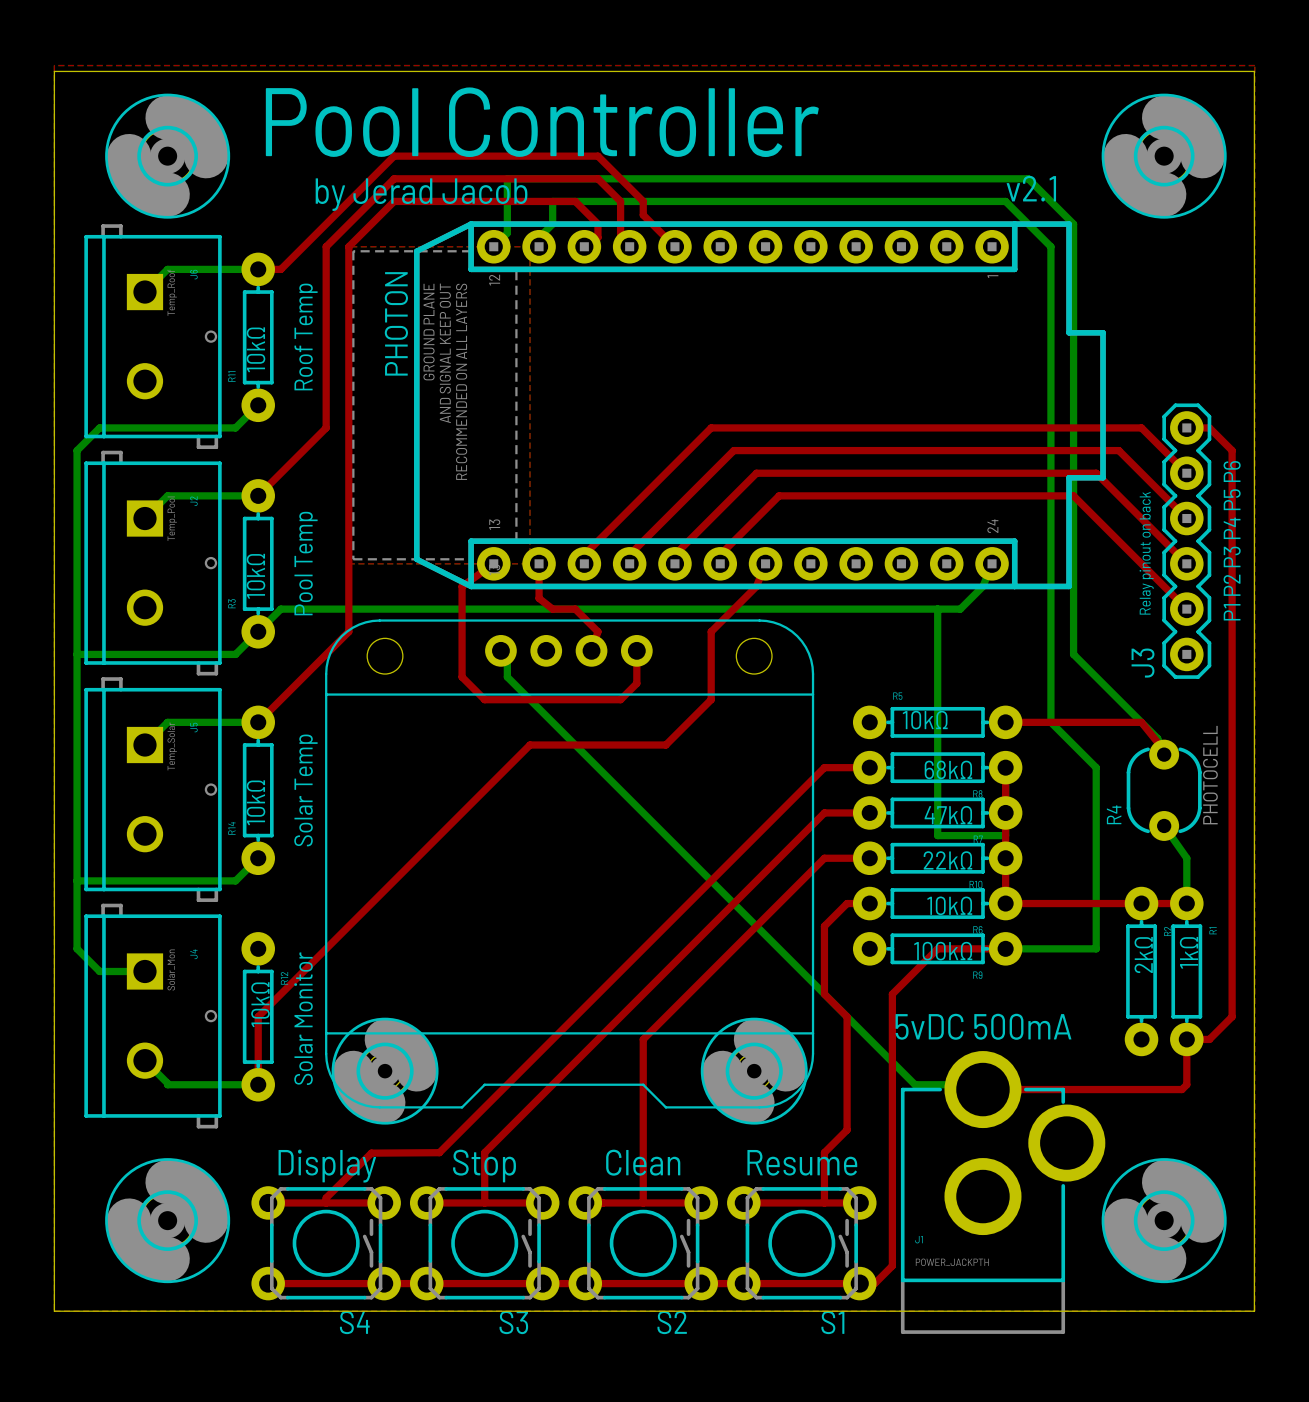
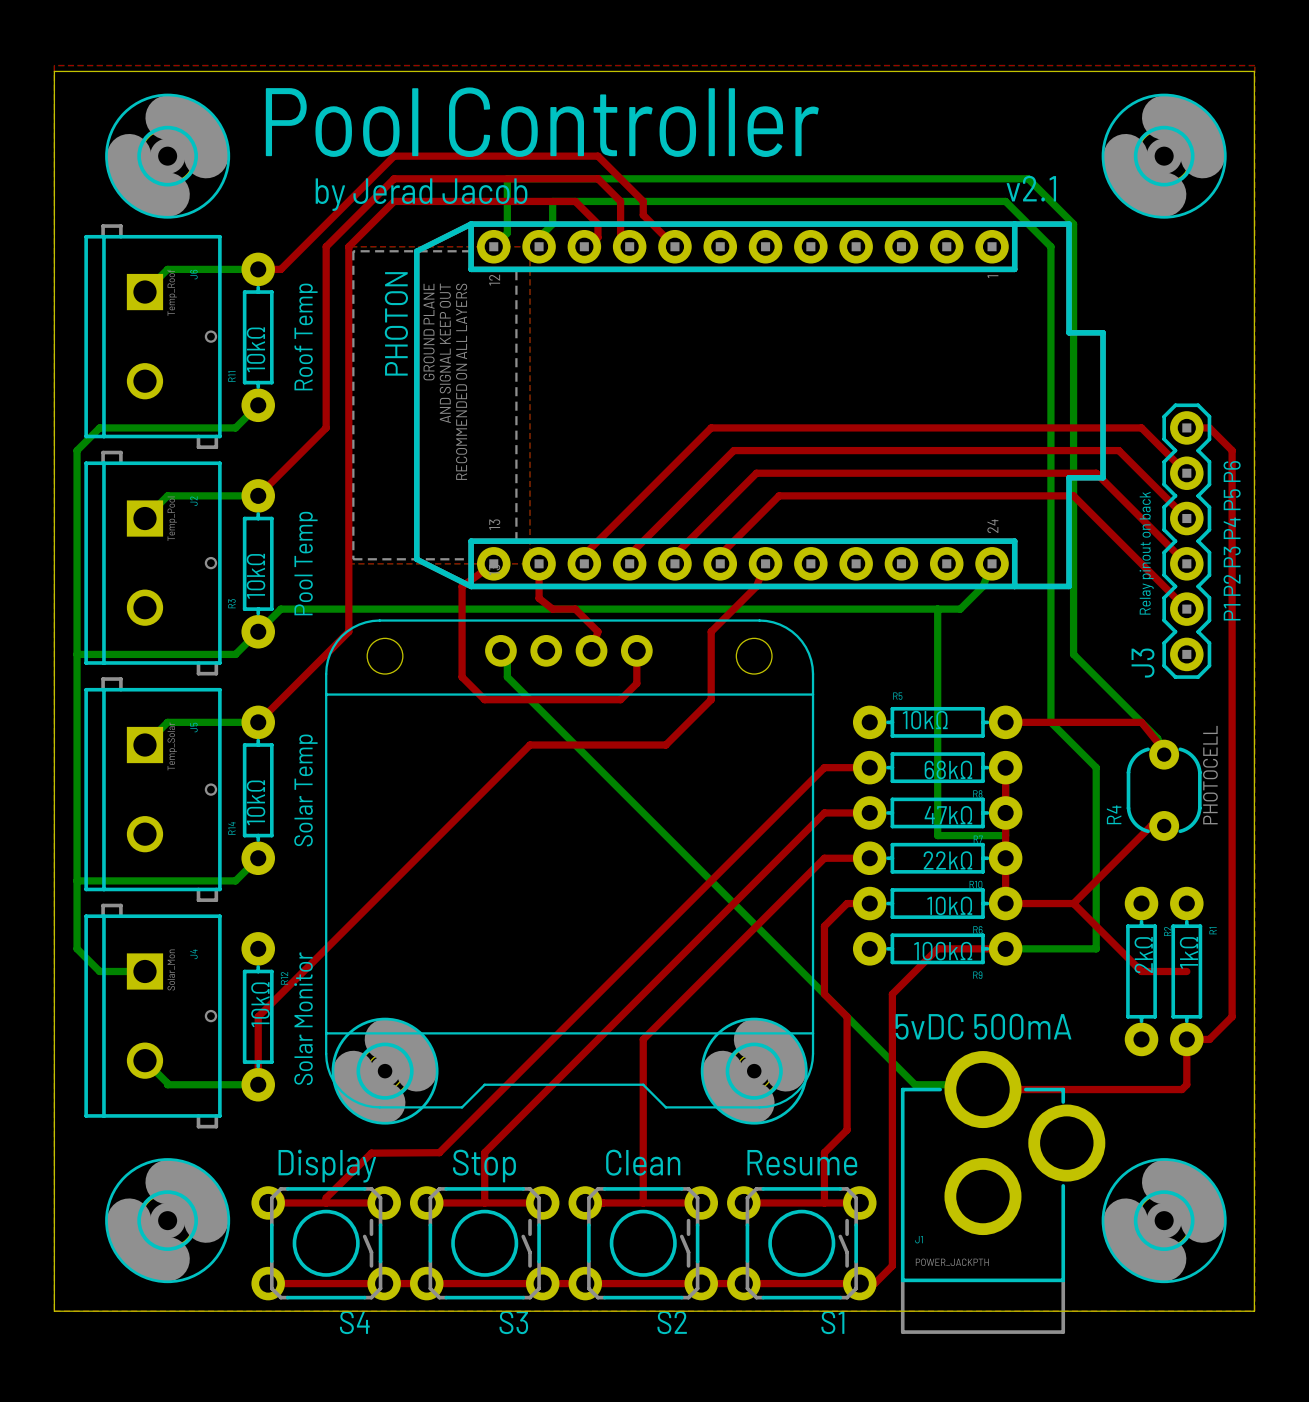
top track: none -> (1164, 825) (1151, 825) (1073, 903) (1141, 971) (1186, 971)
bottom track: (1164, 825) (1186, 858) (1186, 903) -> none
top track: (1073, 903) (1186, 903) -> none

